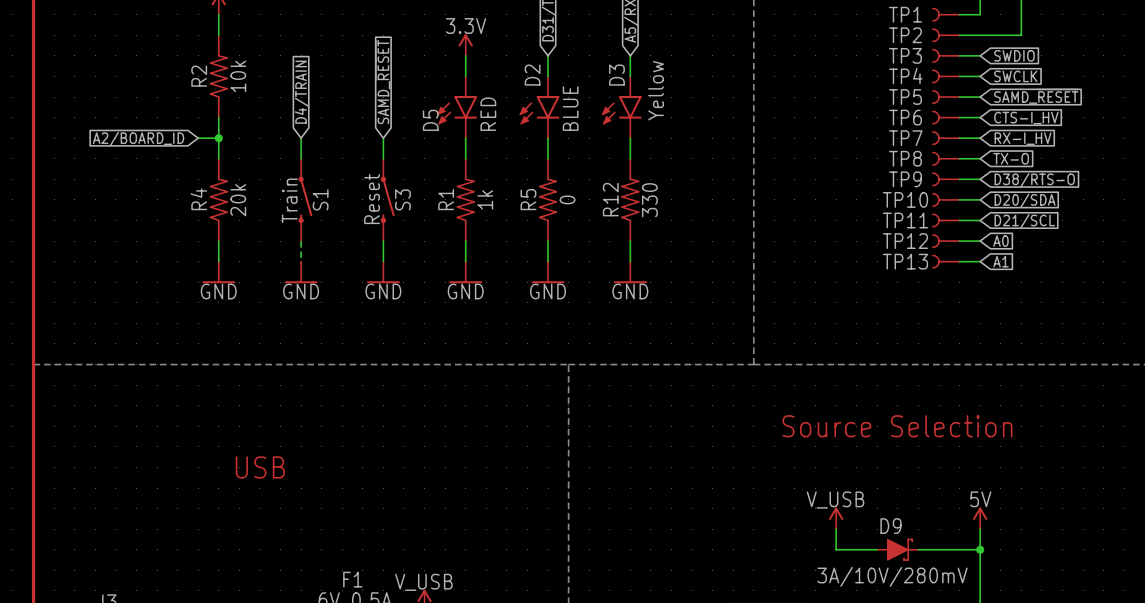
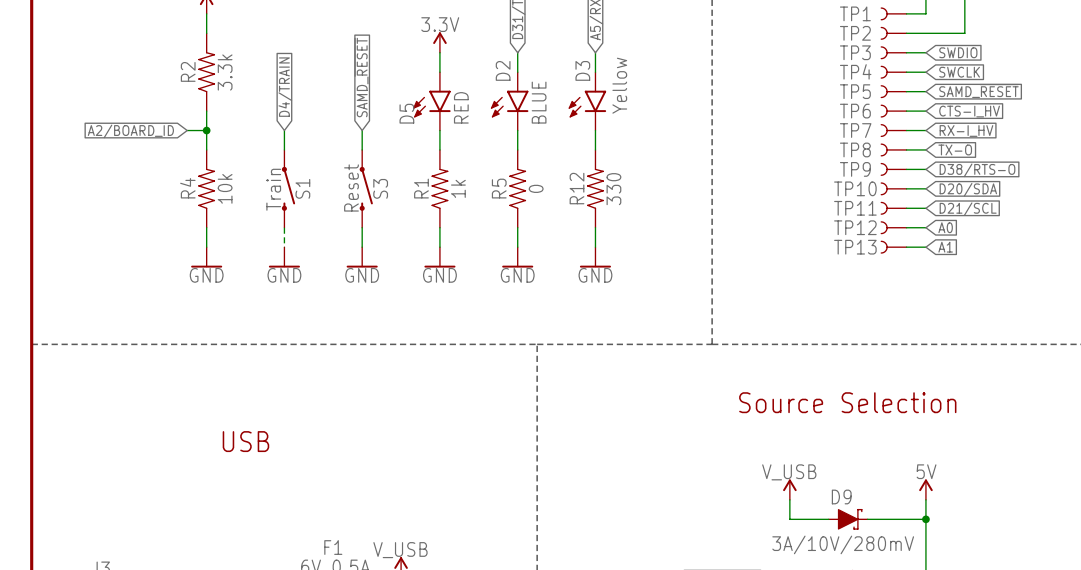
R2 value: 10k (238, 76) -> 3.3k (225, 72)
R4 value: 20k (238, 200) -> 10k (225, 188)

